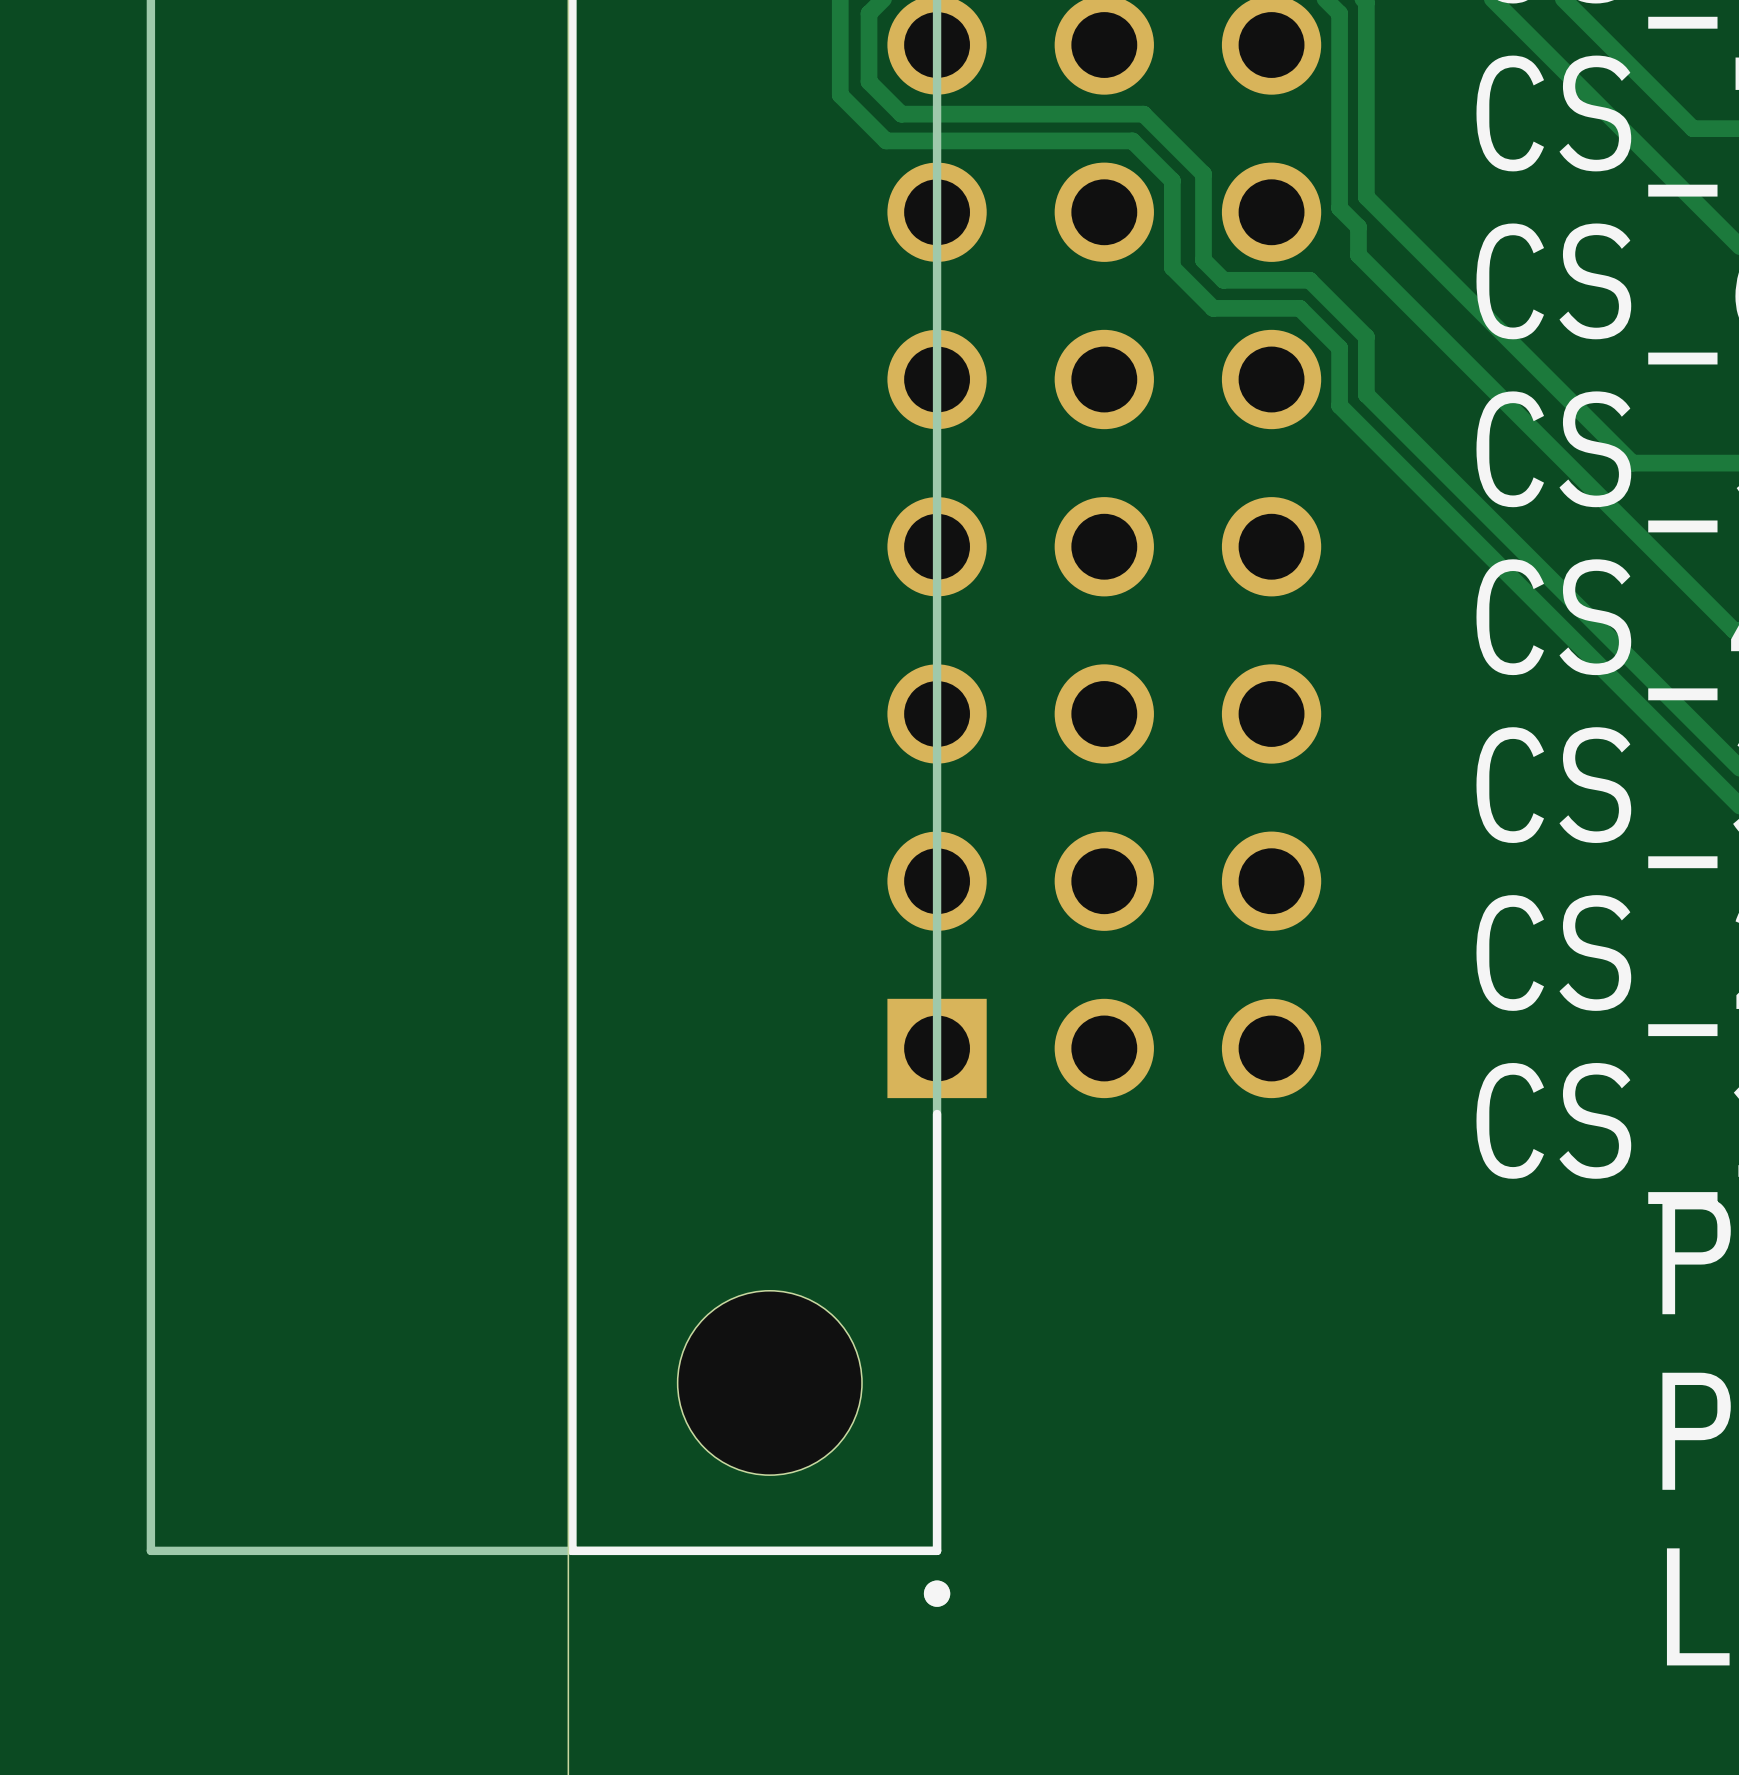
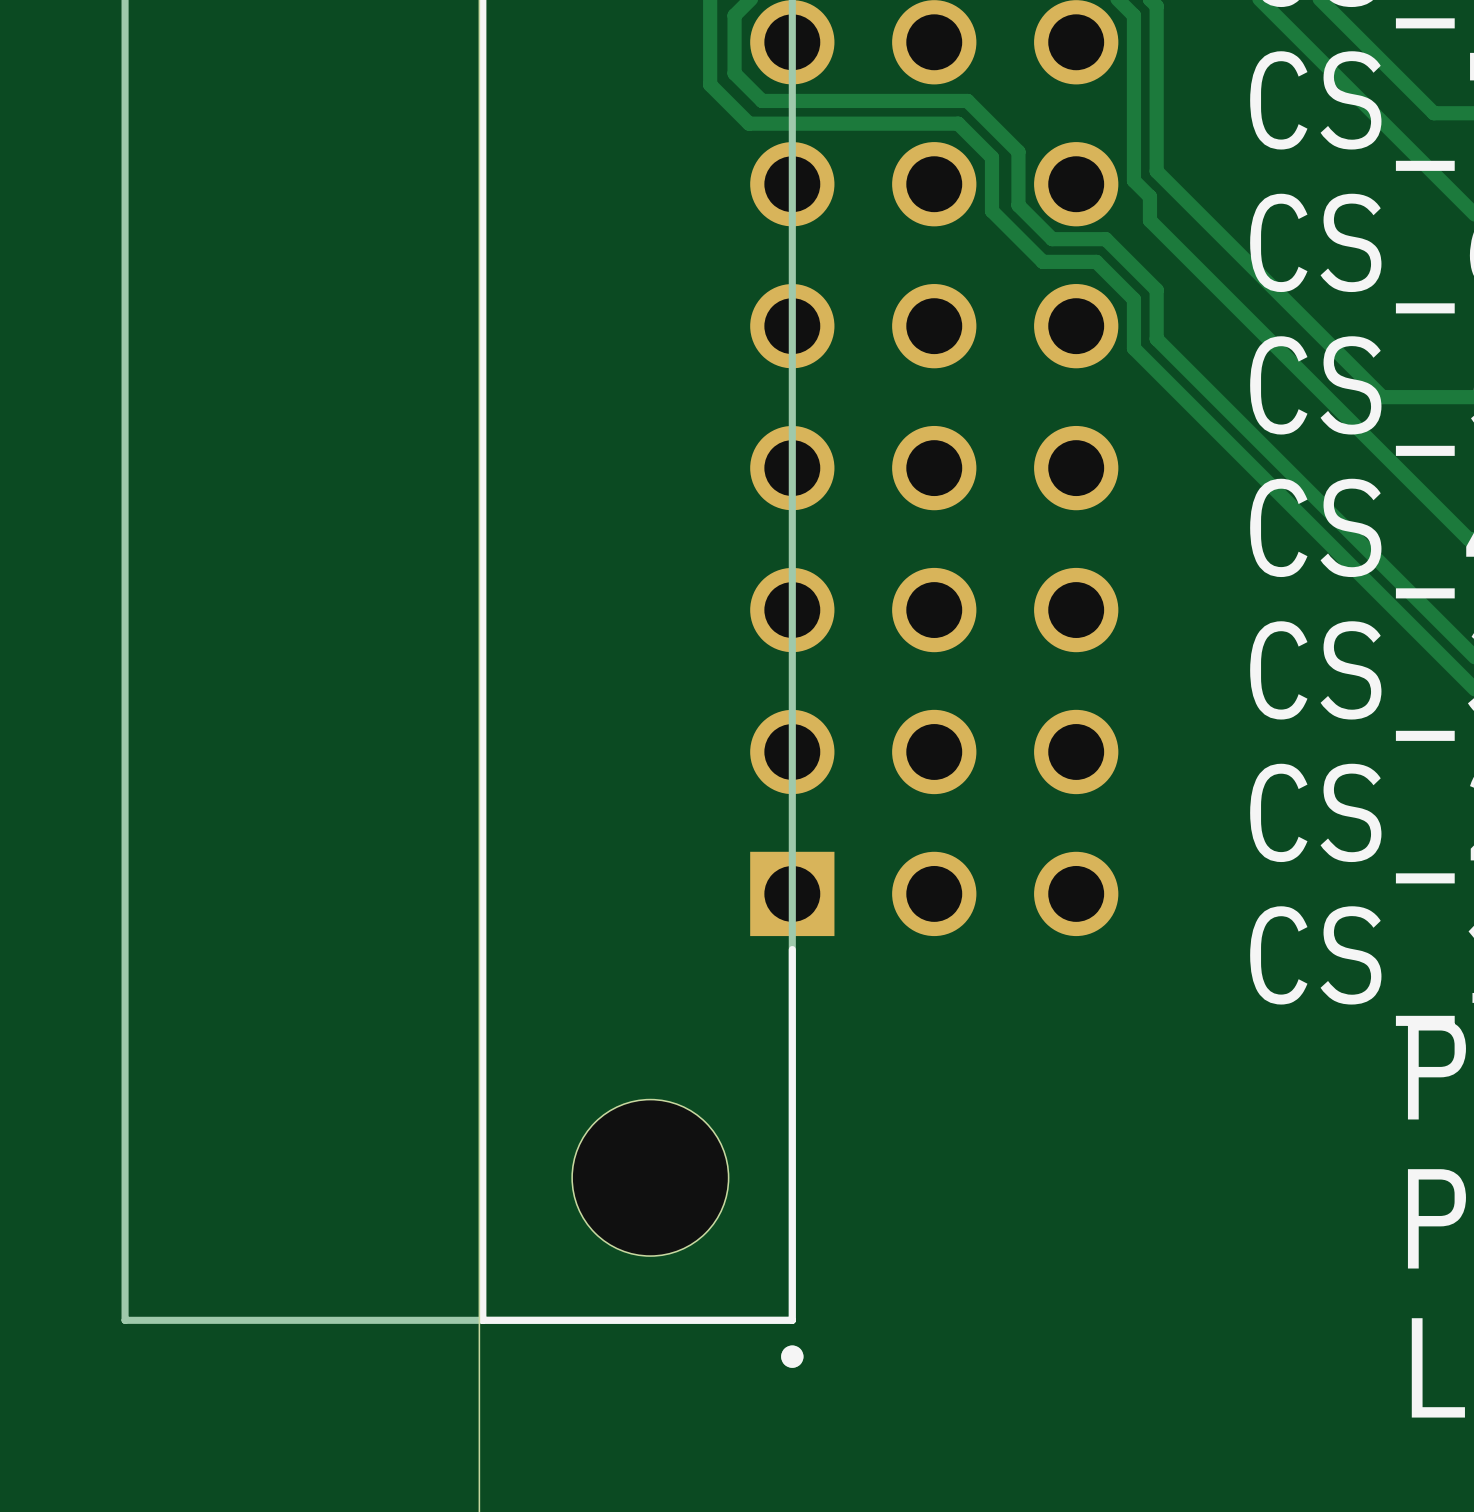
track: (1203, 237) (1203, 260) (1223, 280) (1309, 280) -> (1018, 205) (1052, 239) (1105, 239) (1108, 241)
track: (1172, 243) (1172, 267) (1213, 308) (1299, 308) -> (992, 211) (1042, 261) (1096, 261) (1100, 265)

